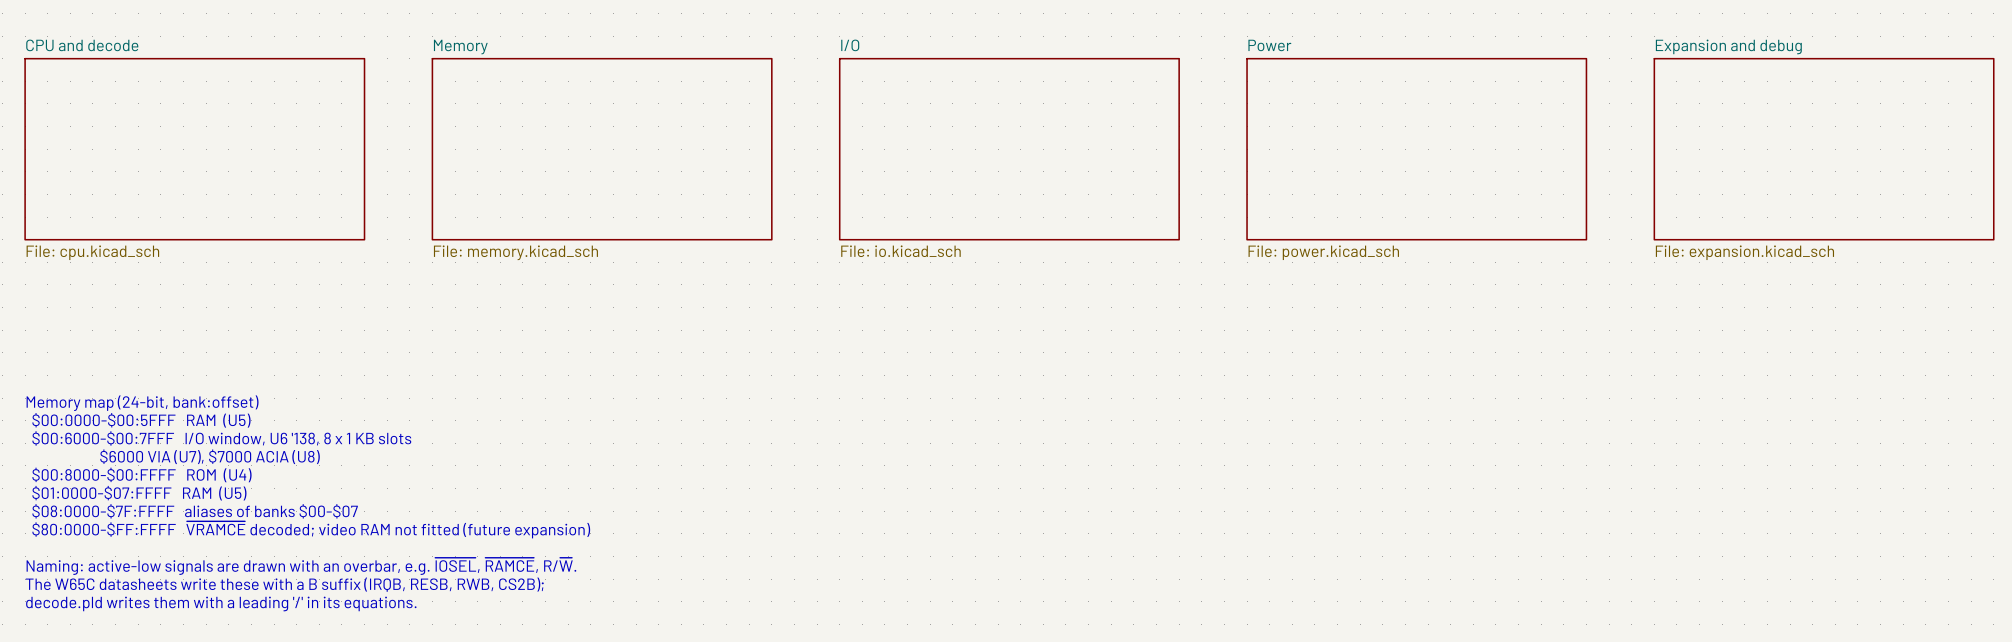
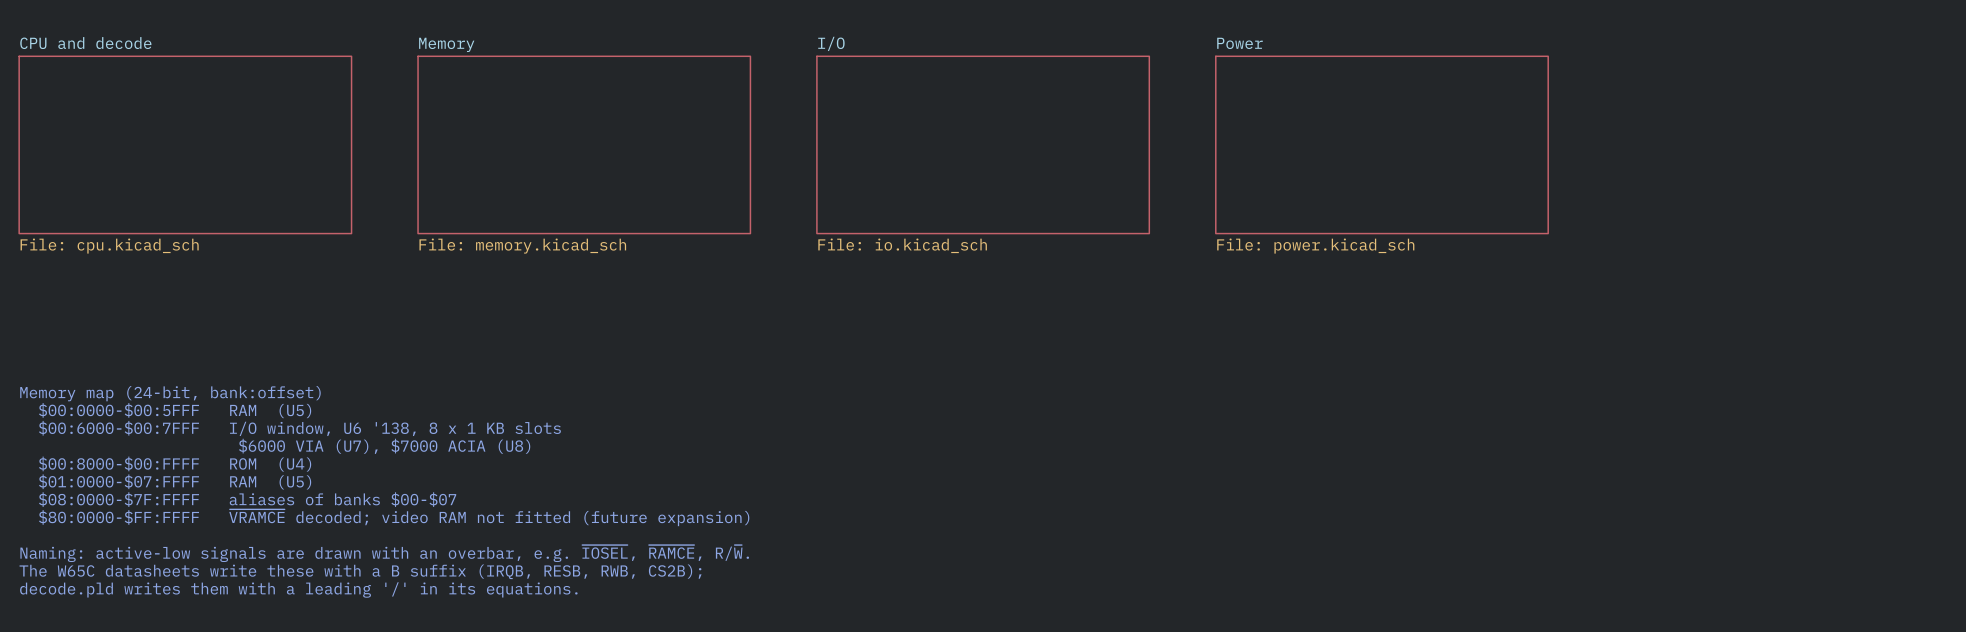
sheet Expansion and debug: File: expansion.kicad_sch (1824, 149) -> none

